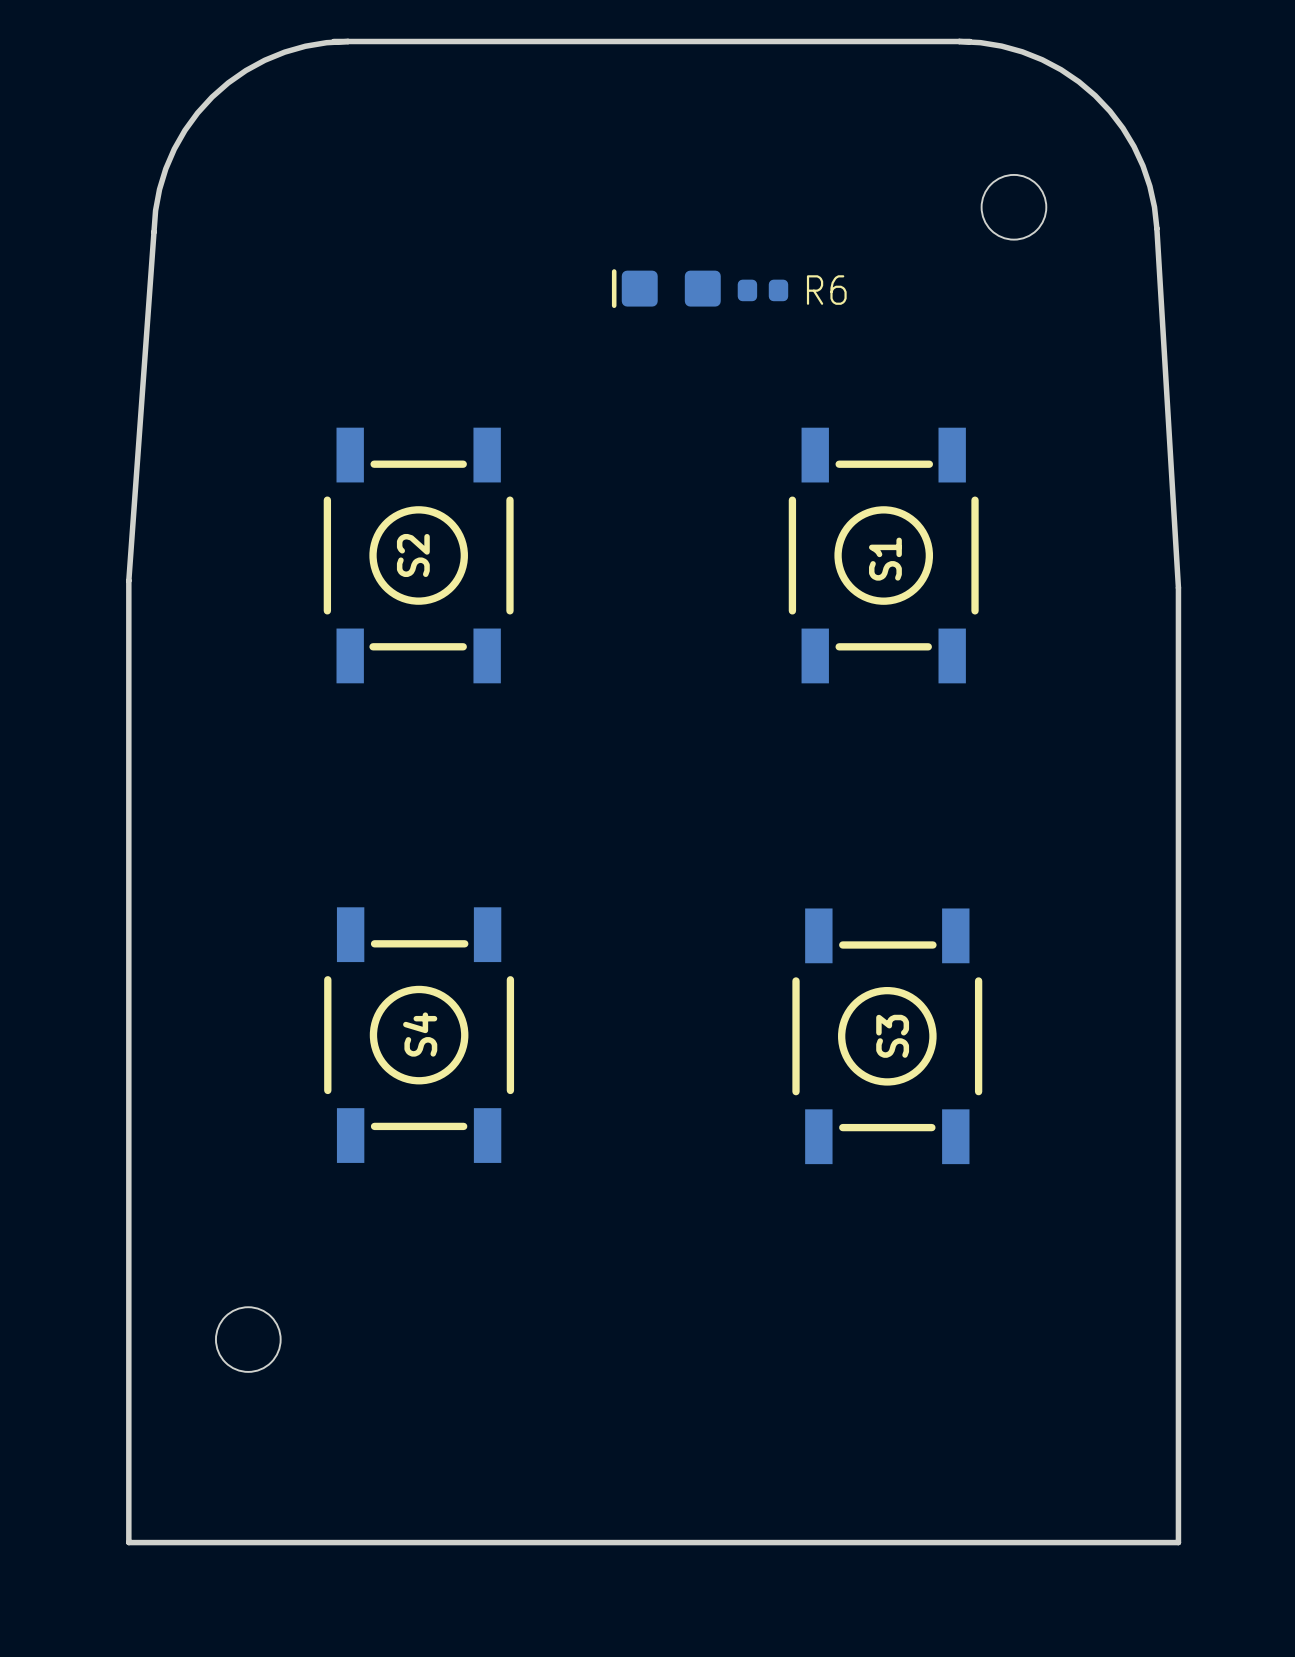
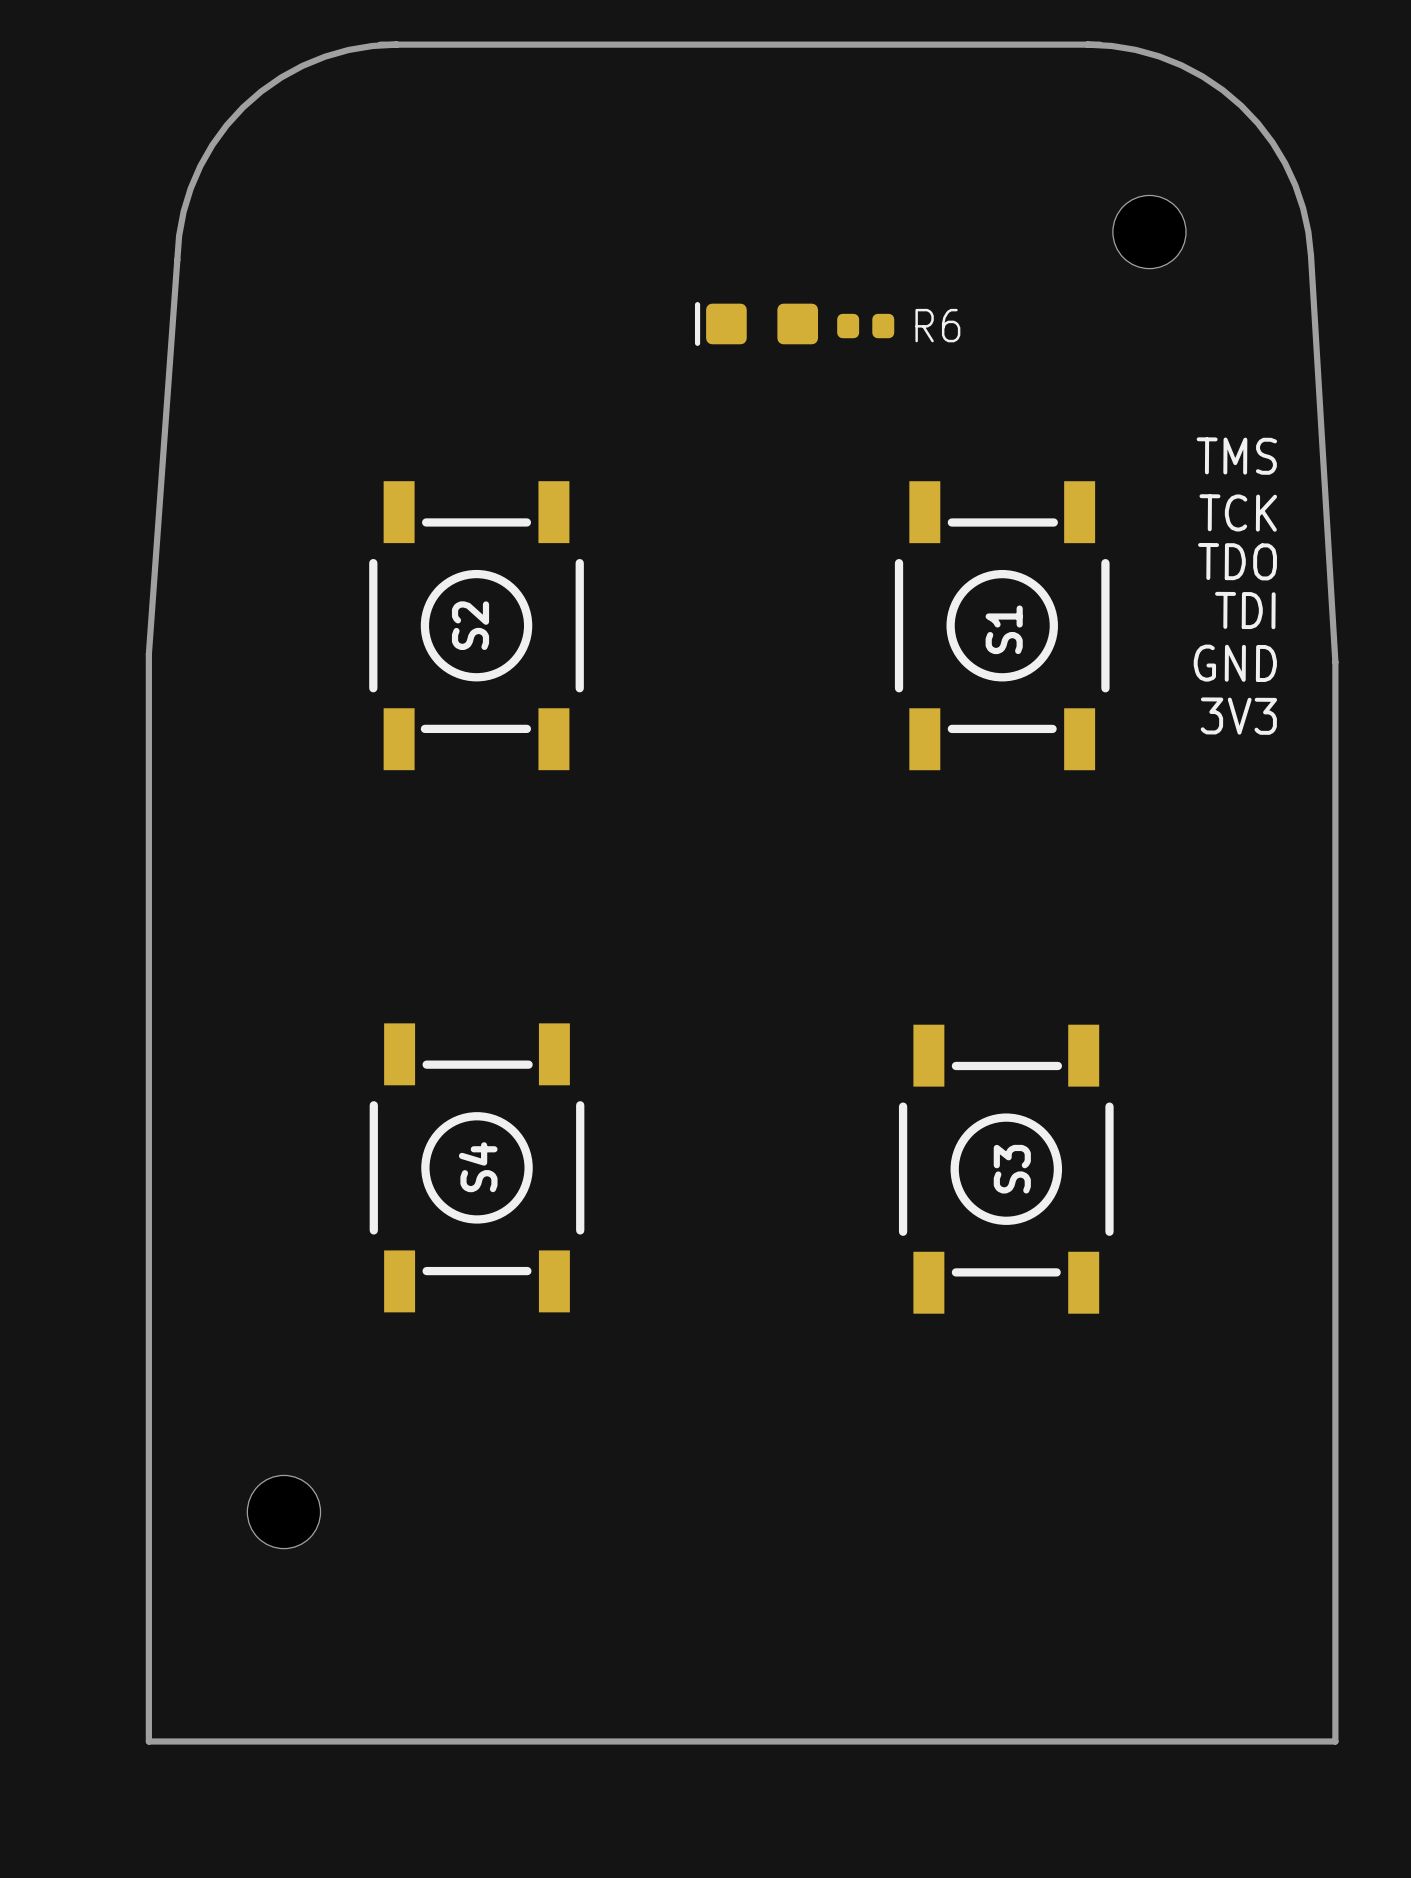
text: none -> TMS (1236, 456)
text: none -> TCK (1238, 512)
text: none -> TDO (1237, 561)
text: none -> TDI (1245, 610)
text: none -> GND (1235, 663)
text: none -> 3V3 (1238, 716)

